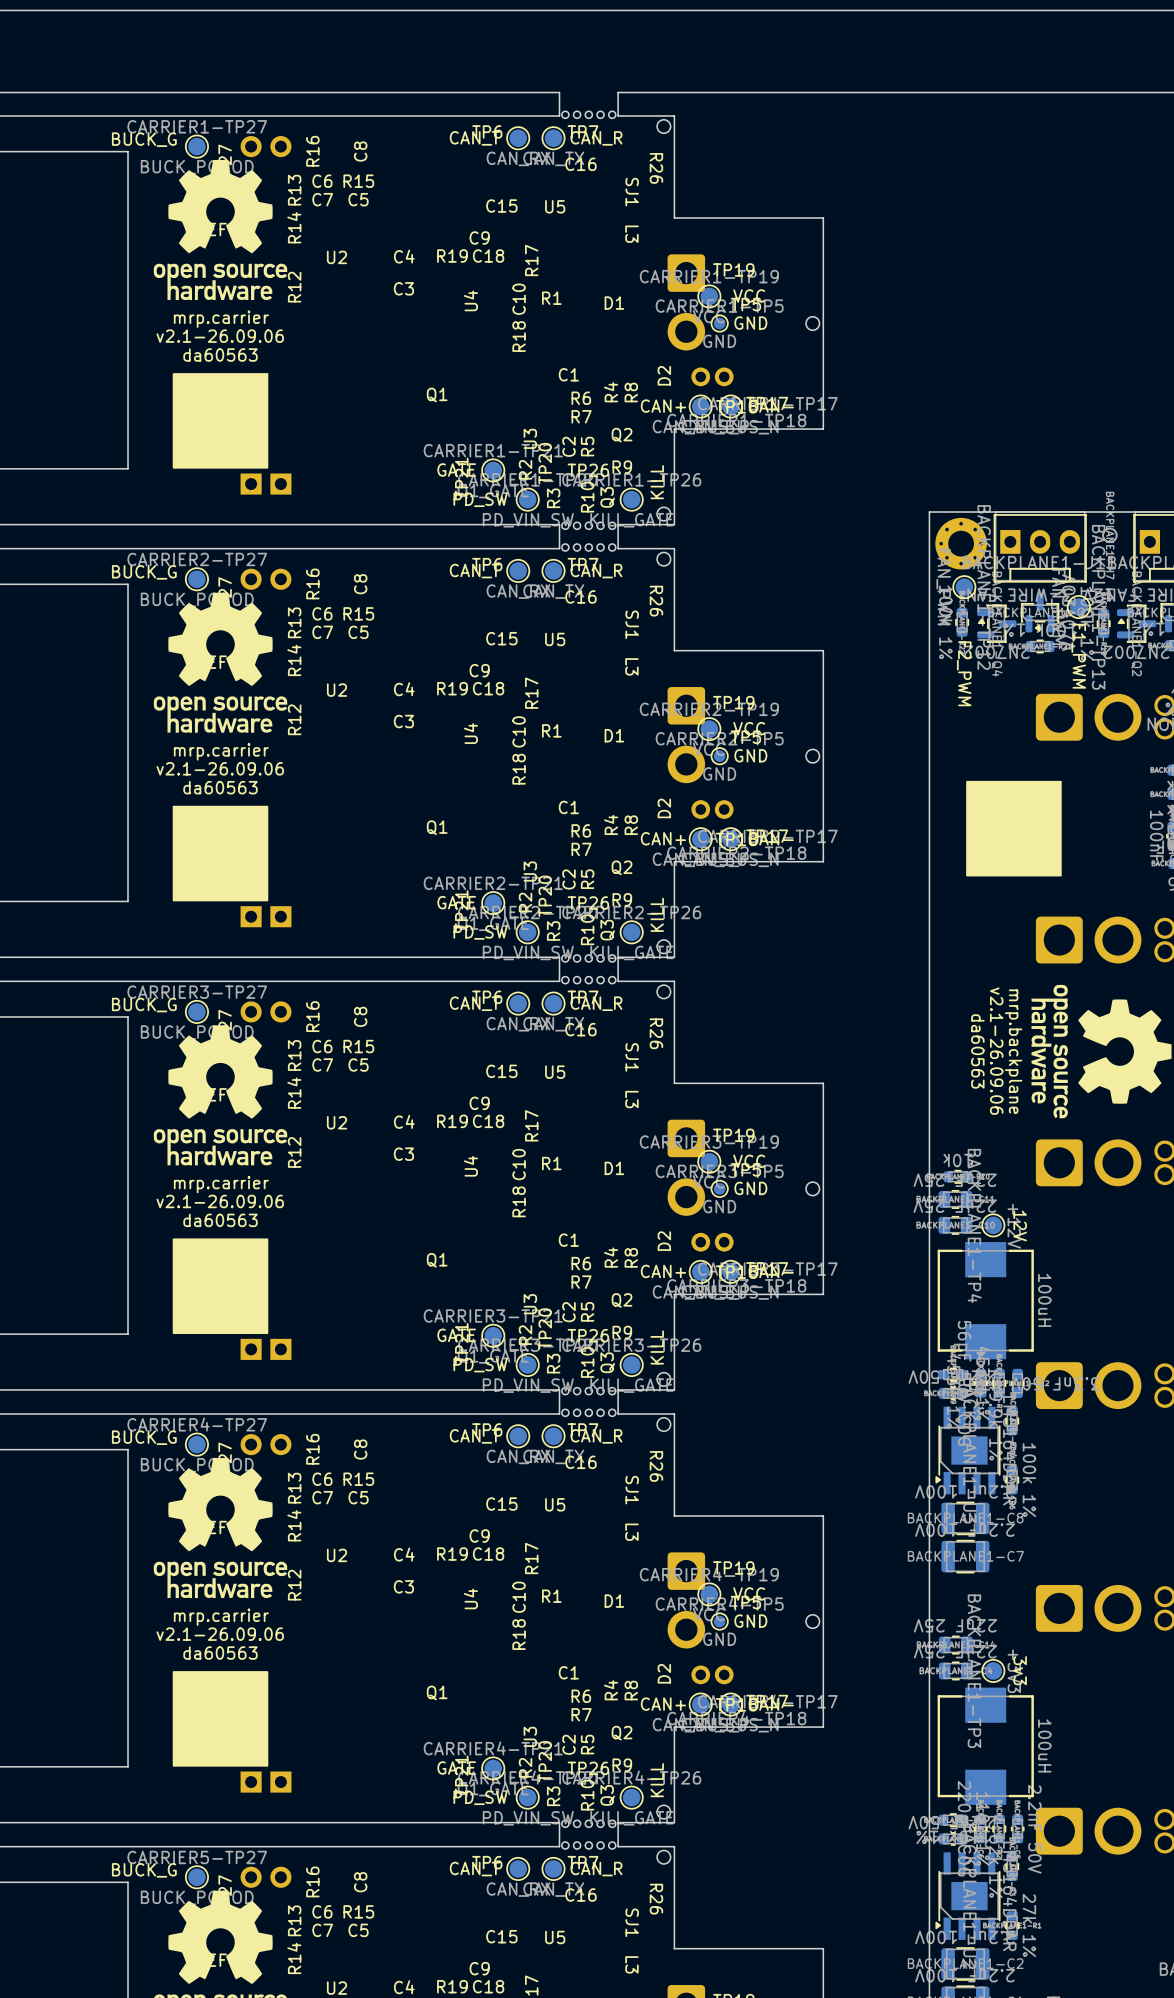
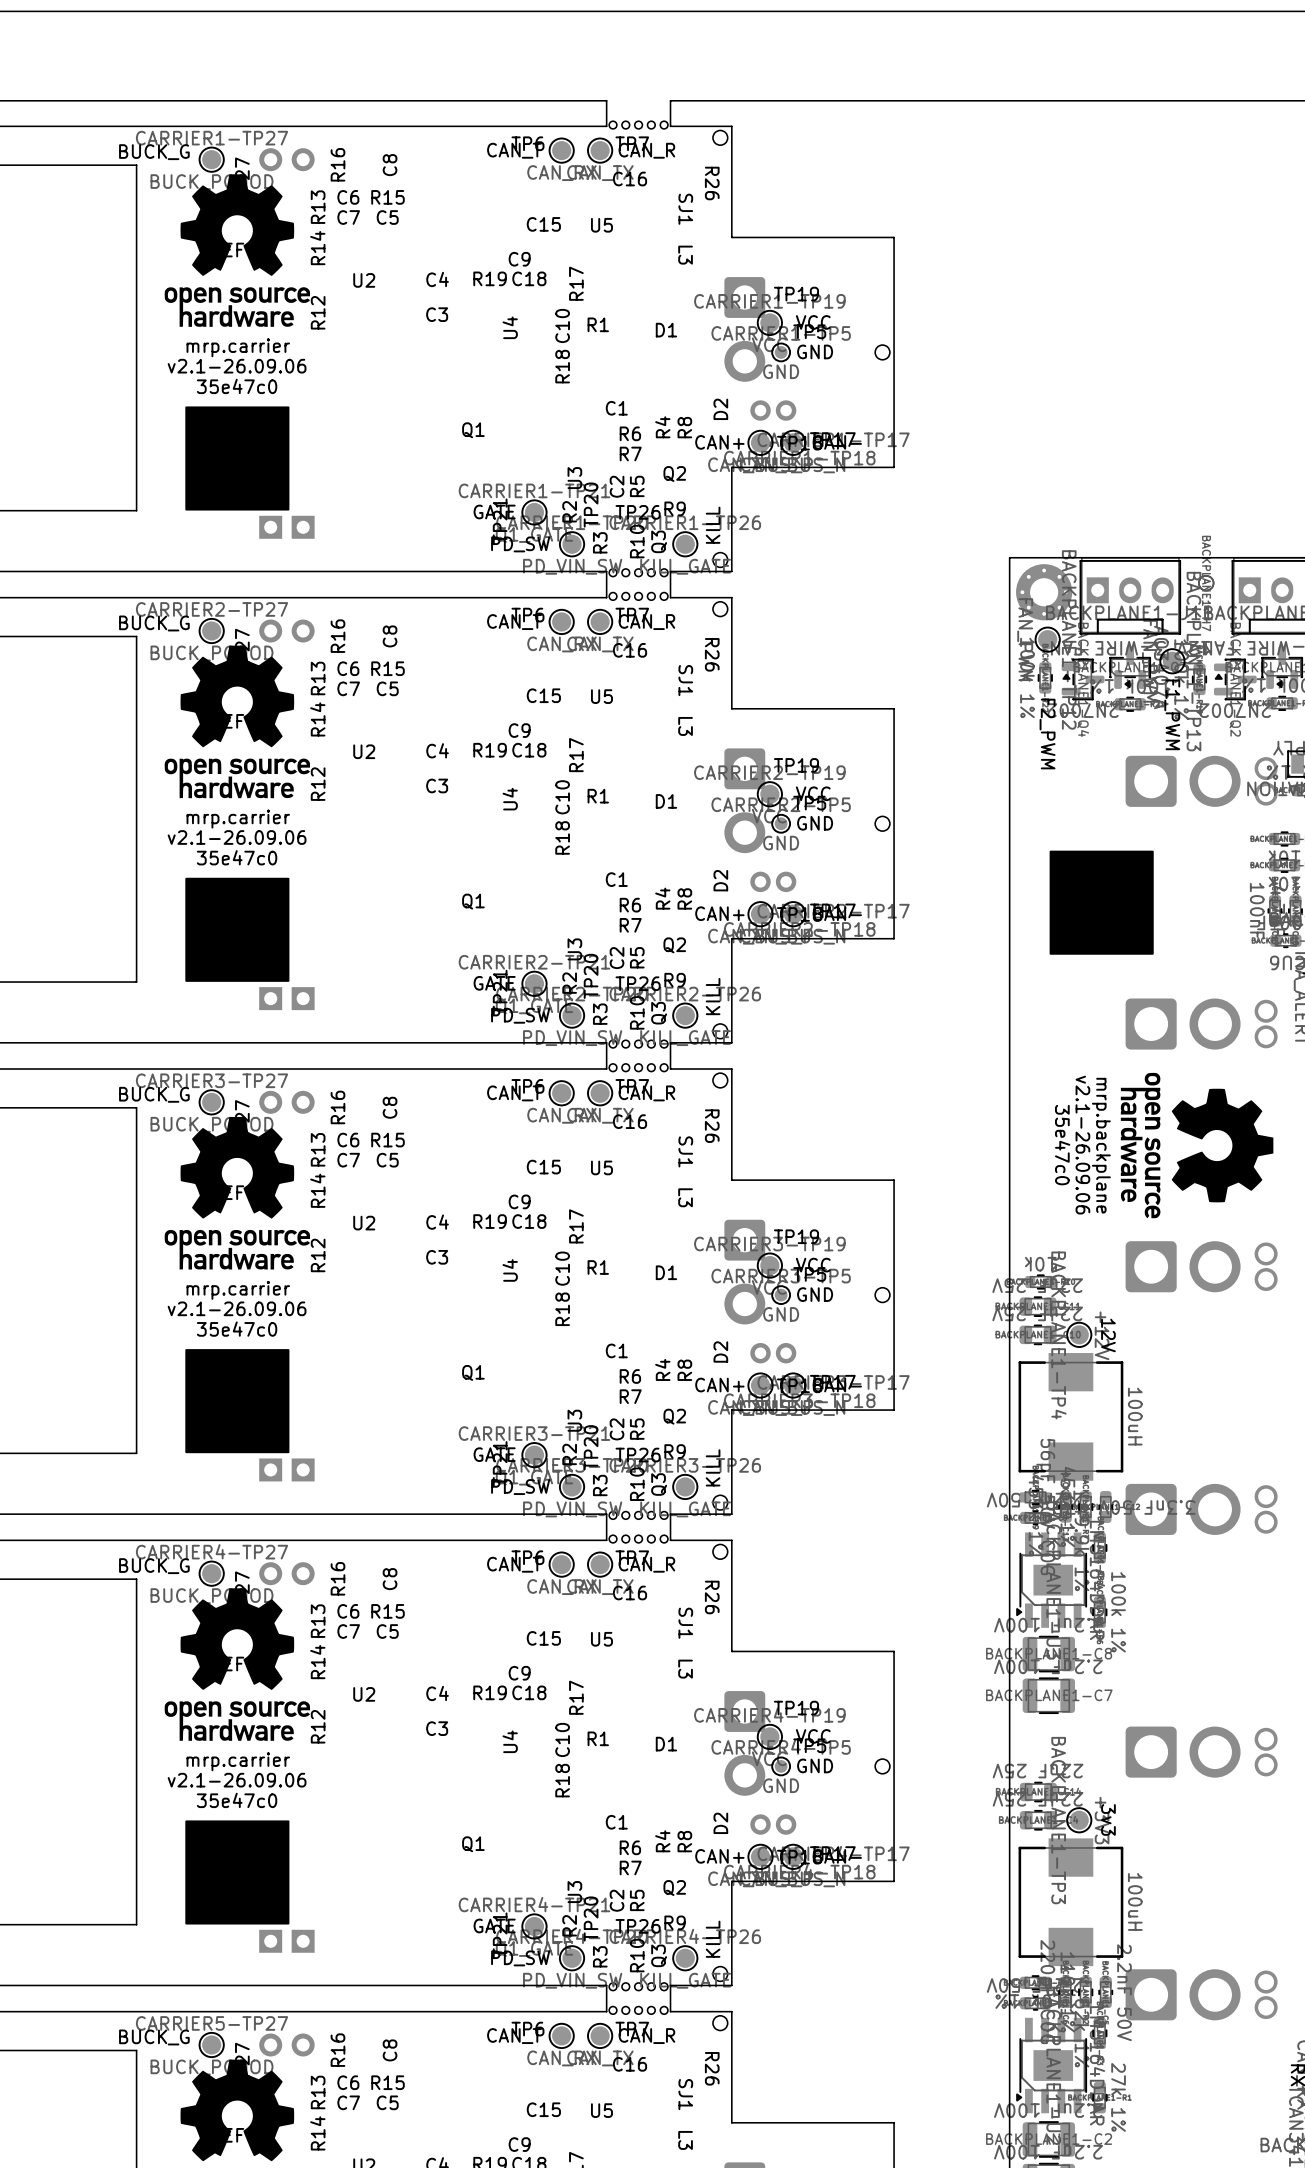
text: da60563 (220, 355) -> 35e47c0 (237, 386)
text: da60563 (220, 787) -> 35e47c0 (237, 857)
text: da60563 (977, 1051) -> 35e47c0 (1062, 1145)
text: da60563 (220, 1220) -> 35e47c0 (237, 1329)
text: da60563 (220, 1653) -> 35e47c0 (237, 1800)

